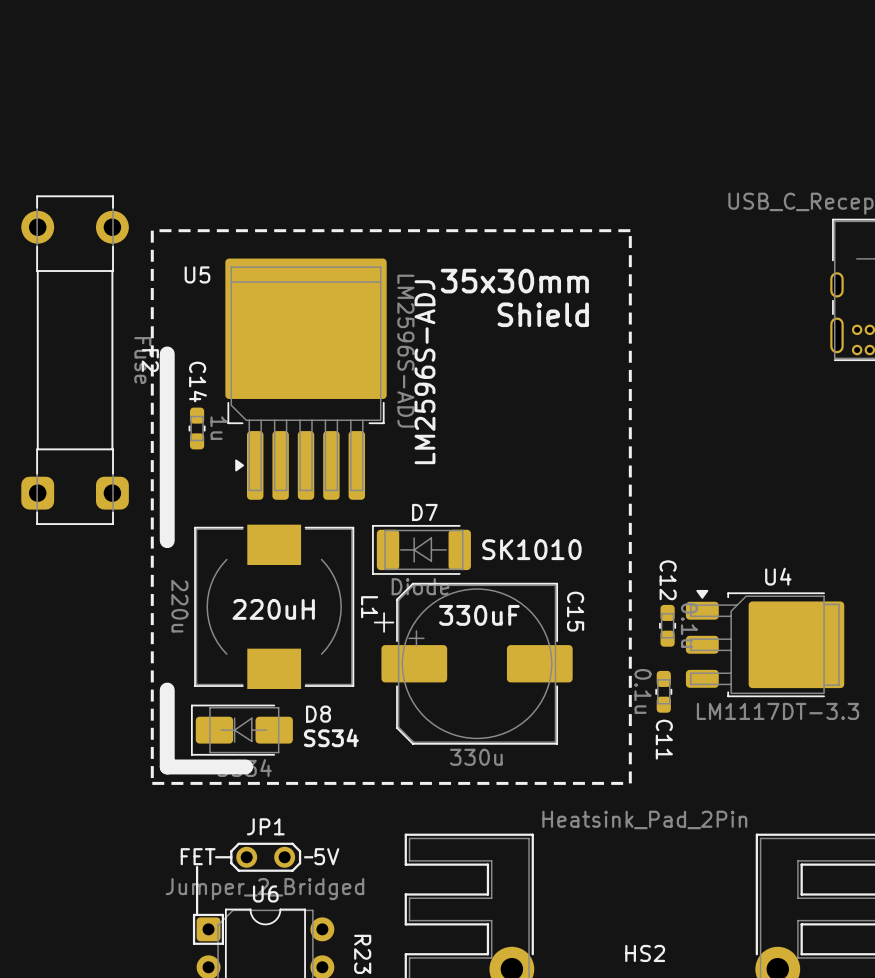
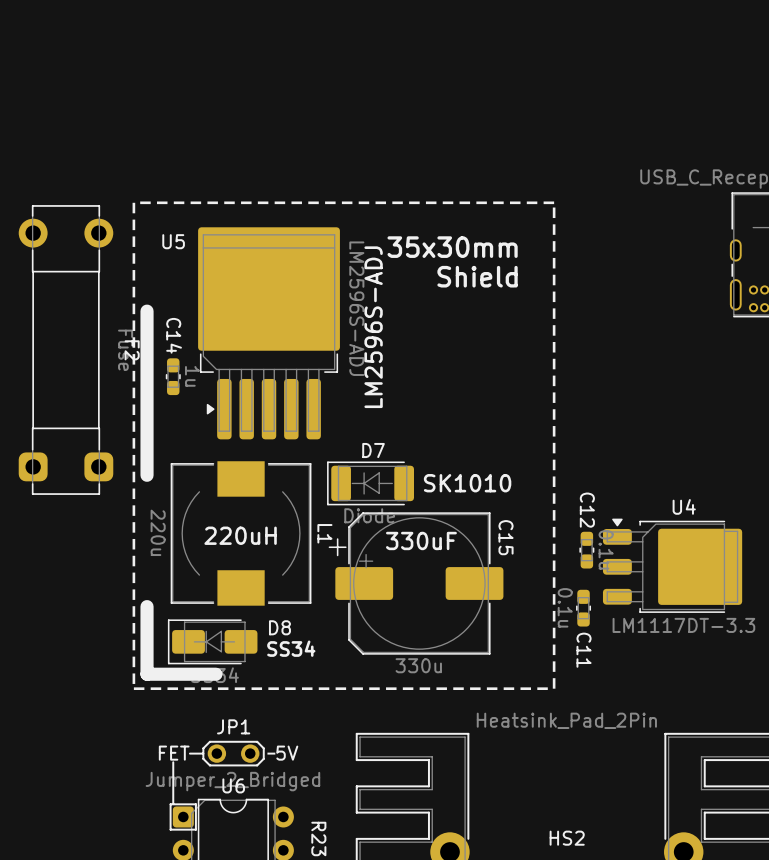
F2 position: (75, 360) -> (65, 350)

